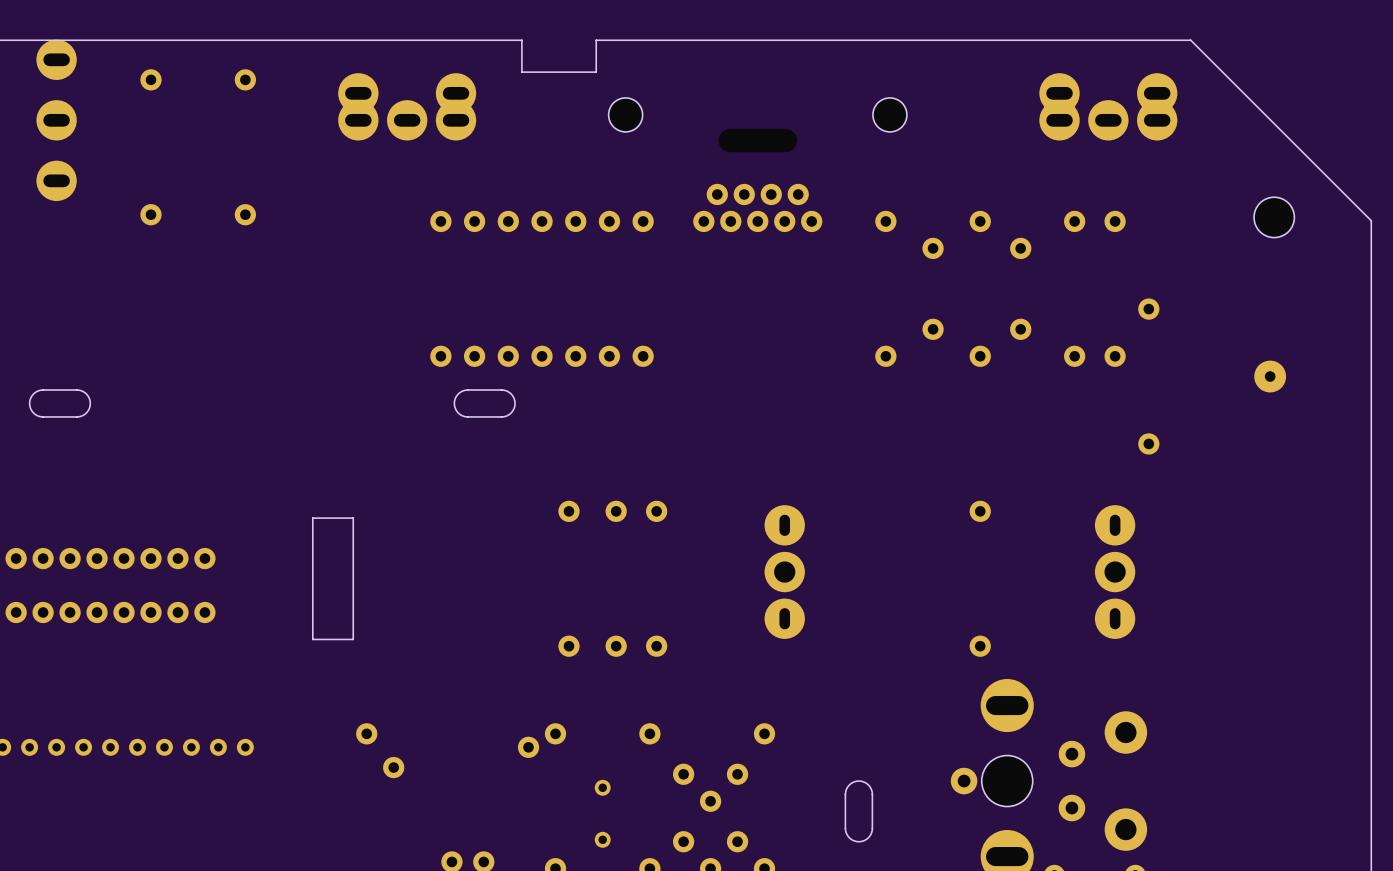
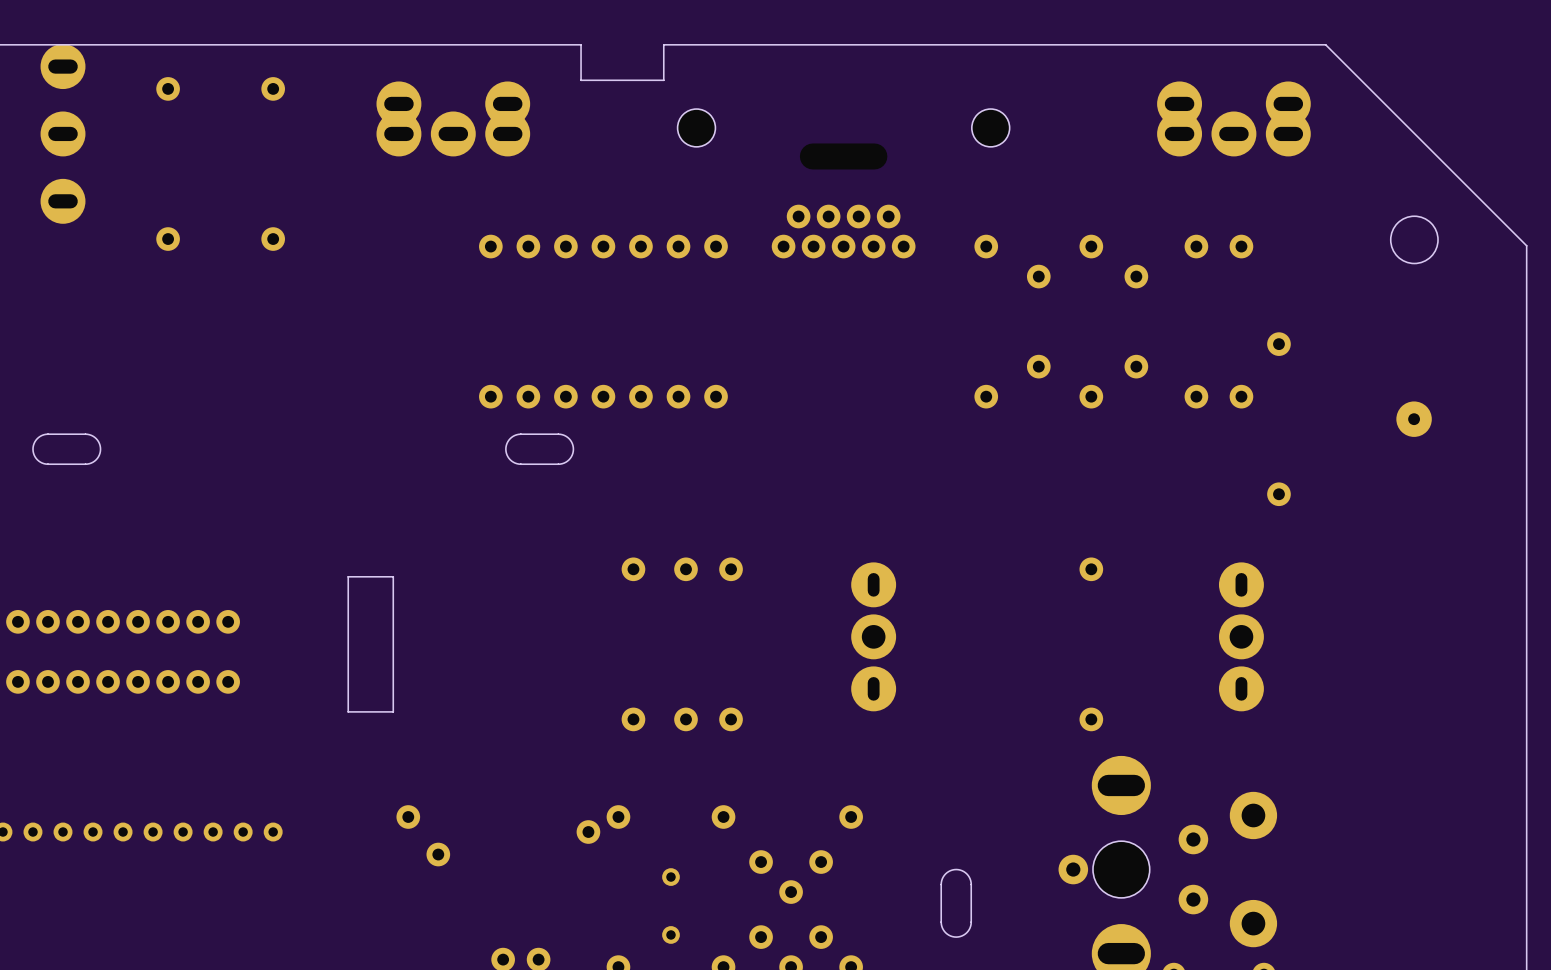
round board edge: none -> [1390, 215, 1439, 264]
part: (1274, 217) -> none

